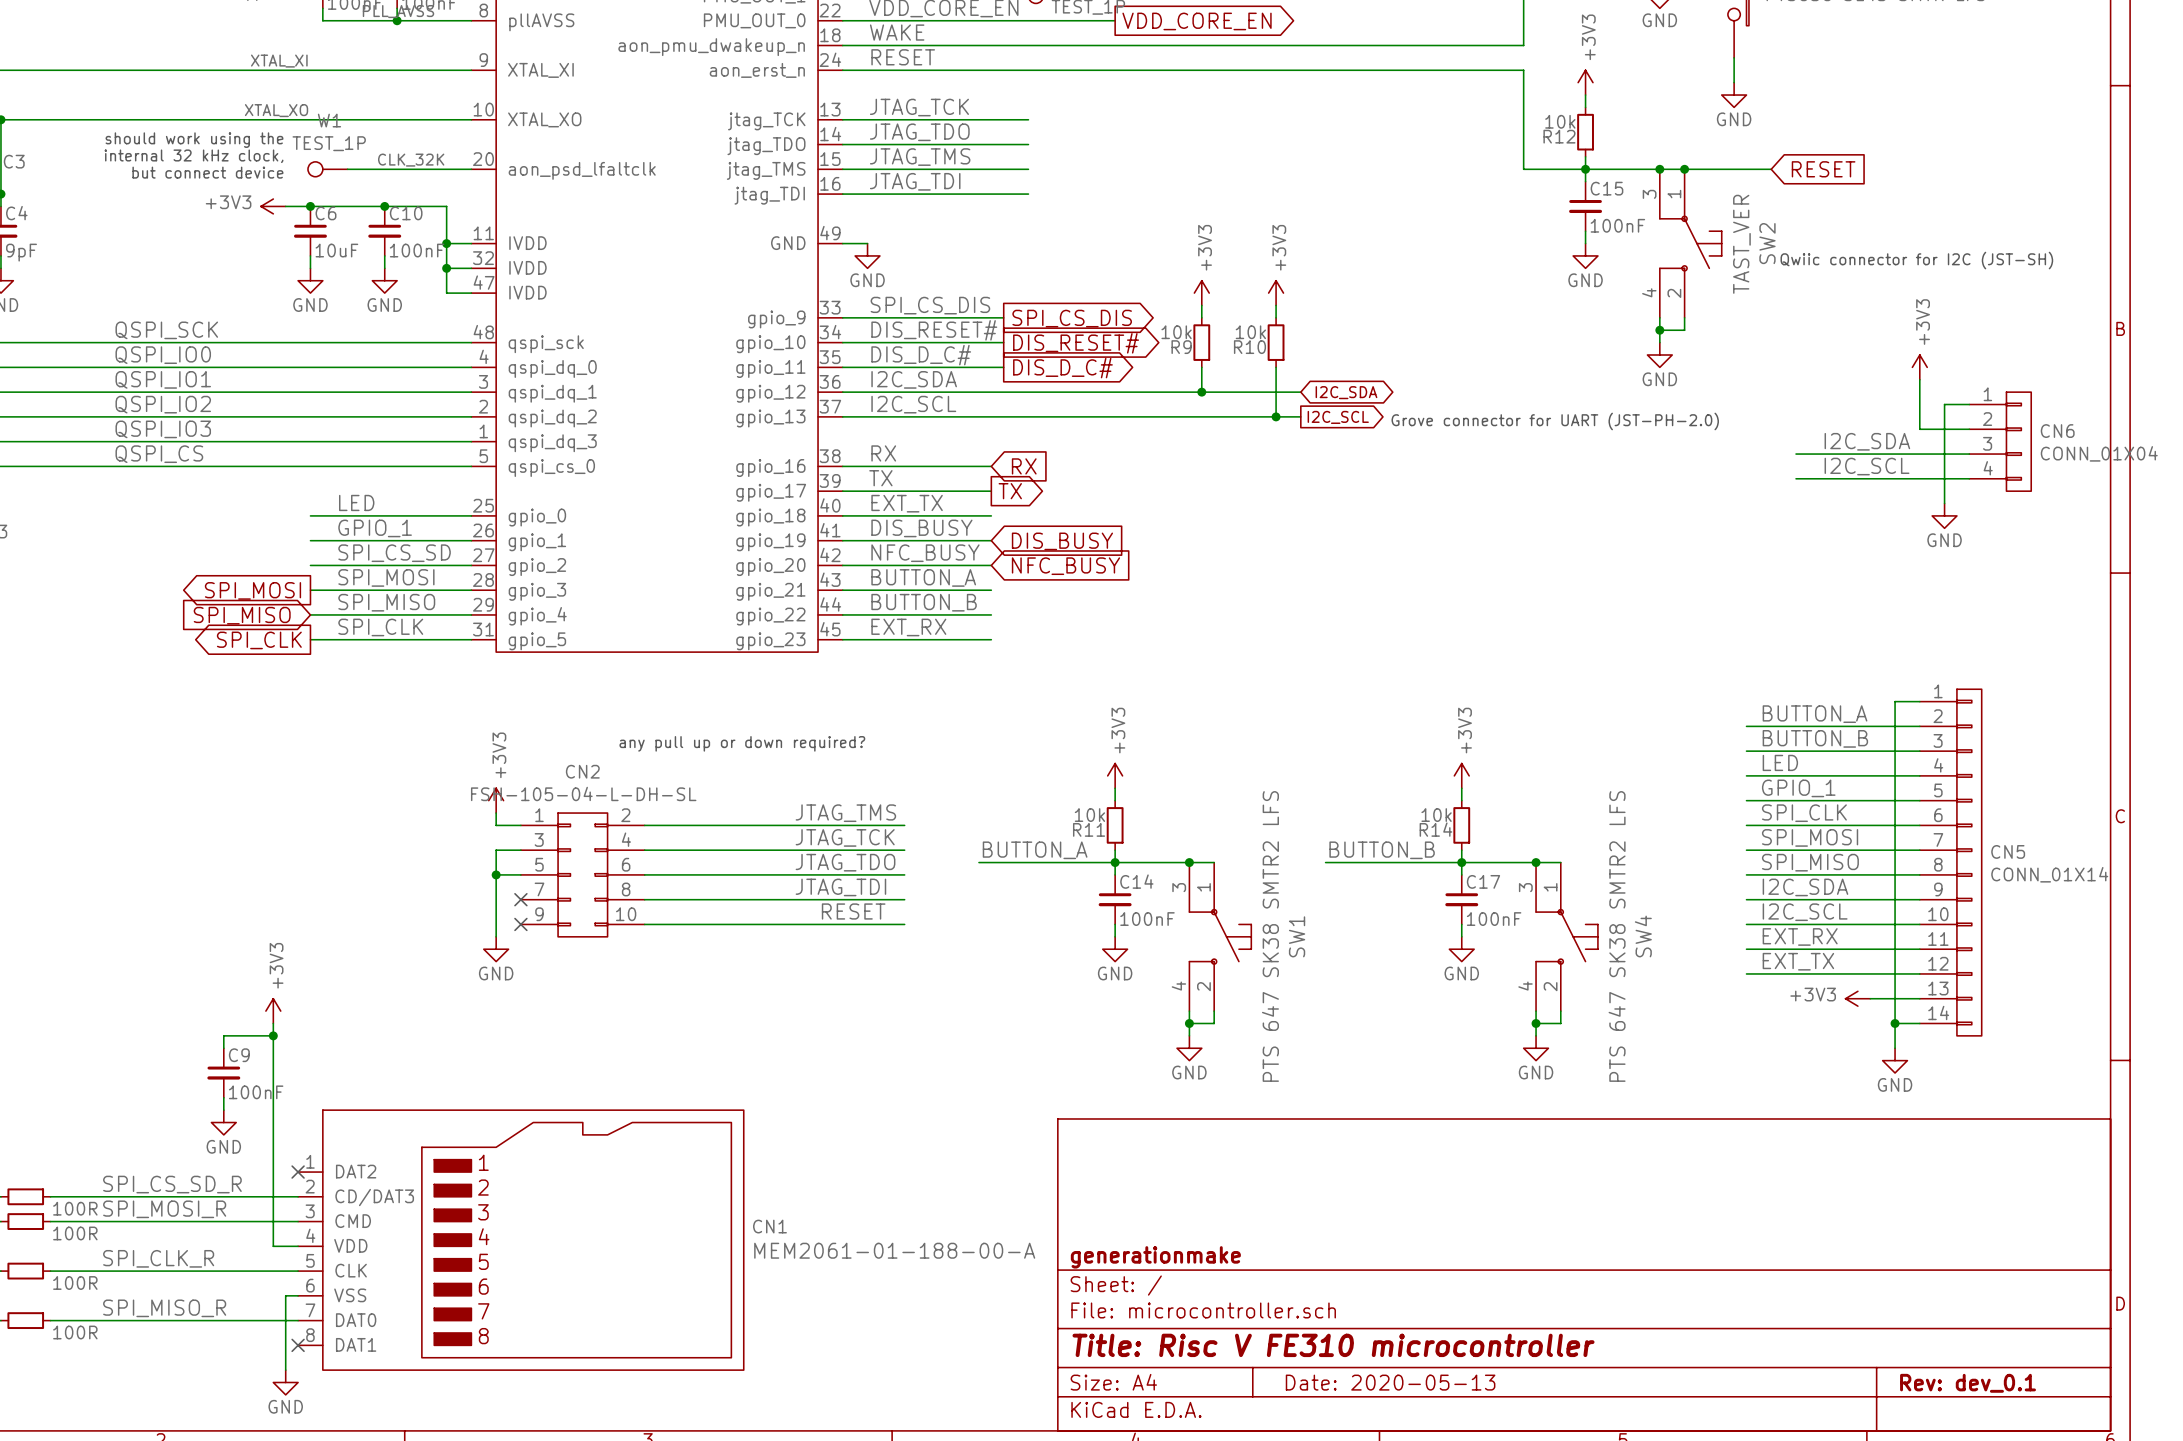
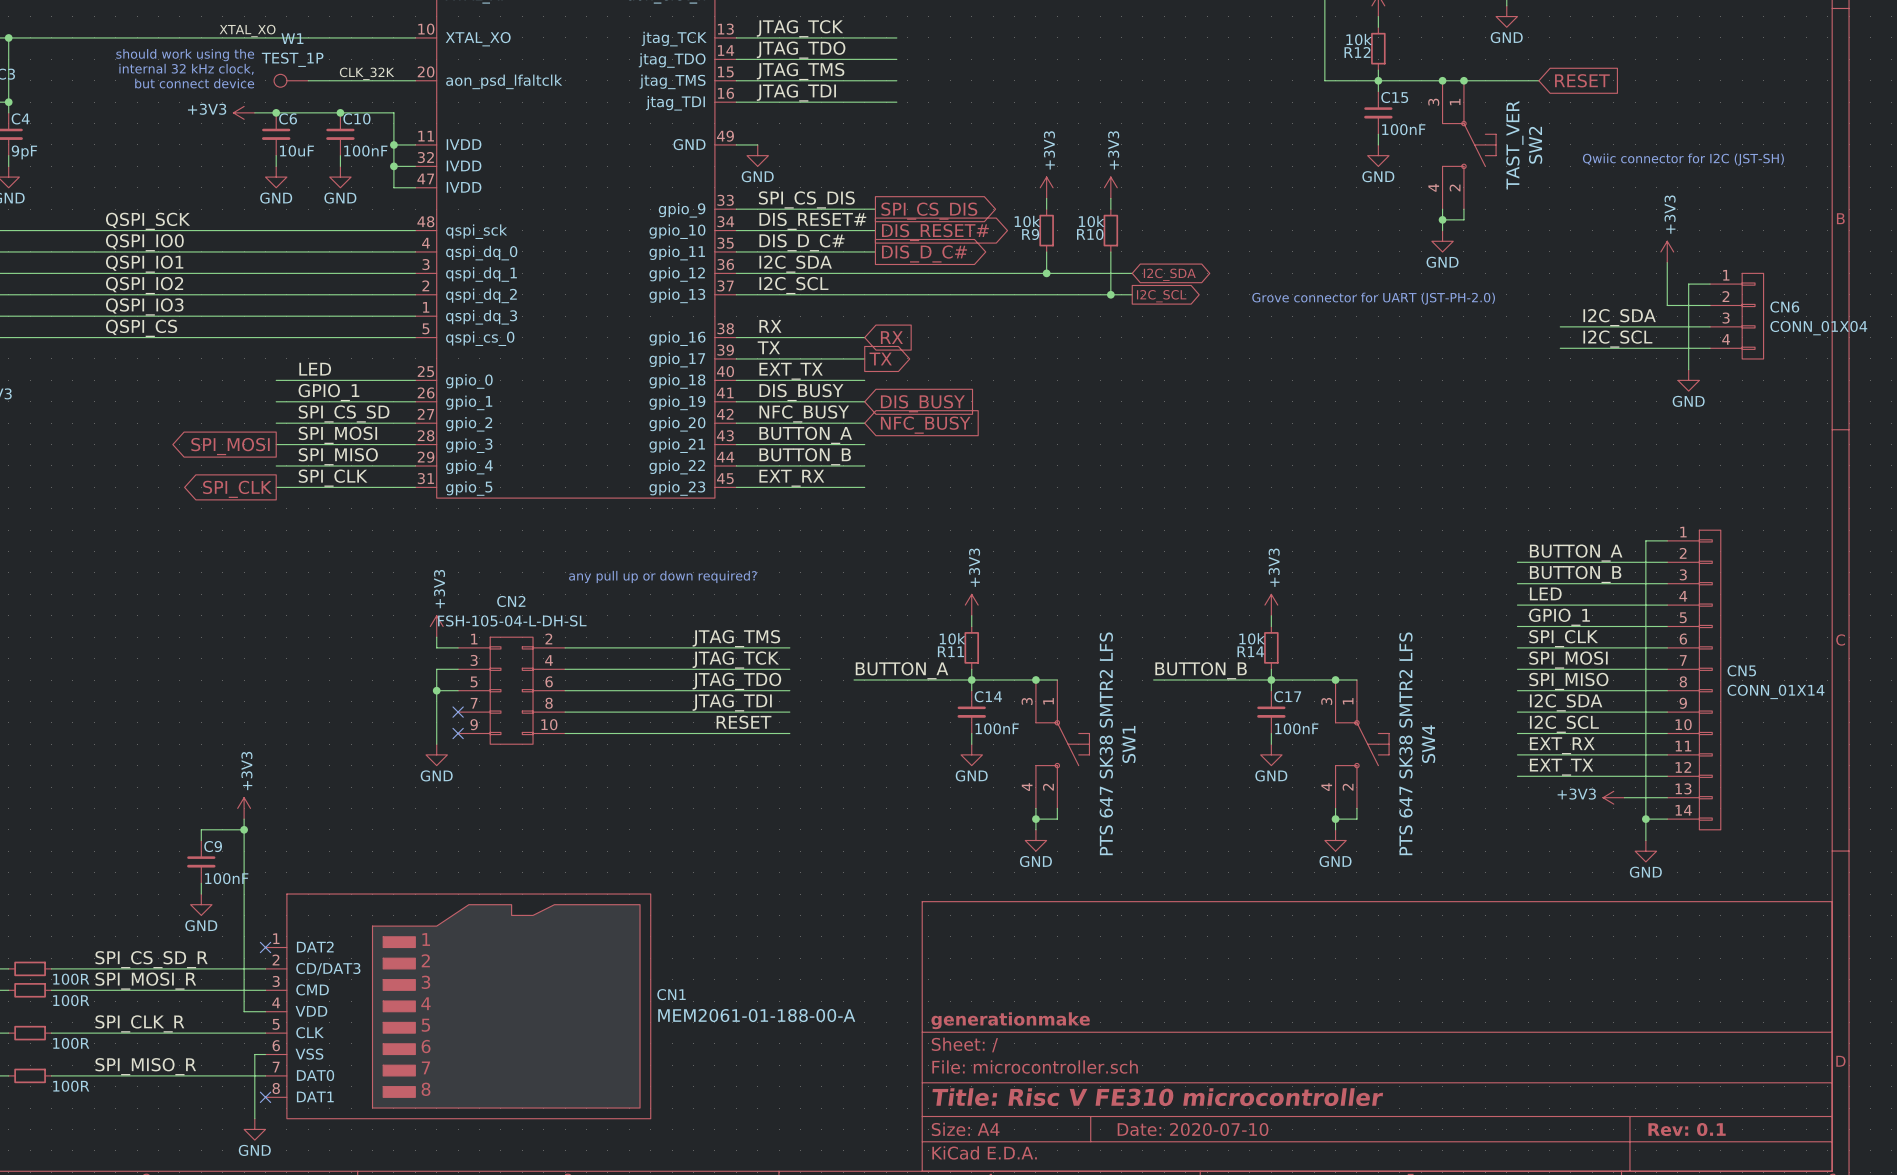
global label: SPI_MISO (242, 615) -> none
title block: Date: 2020-05-13 (1390, 1382) -> Date: 2020-07-10 (1193, 1129)
title block: Rev: dev_0.1 (1968, 1383) -> Rev: 0.1 (1687, 1129)

